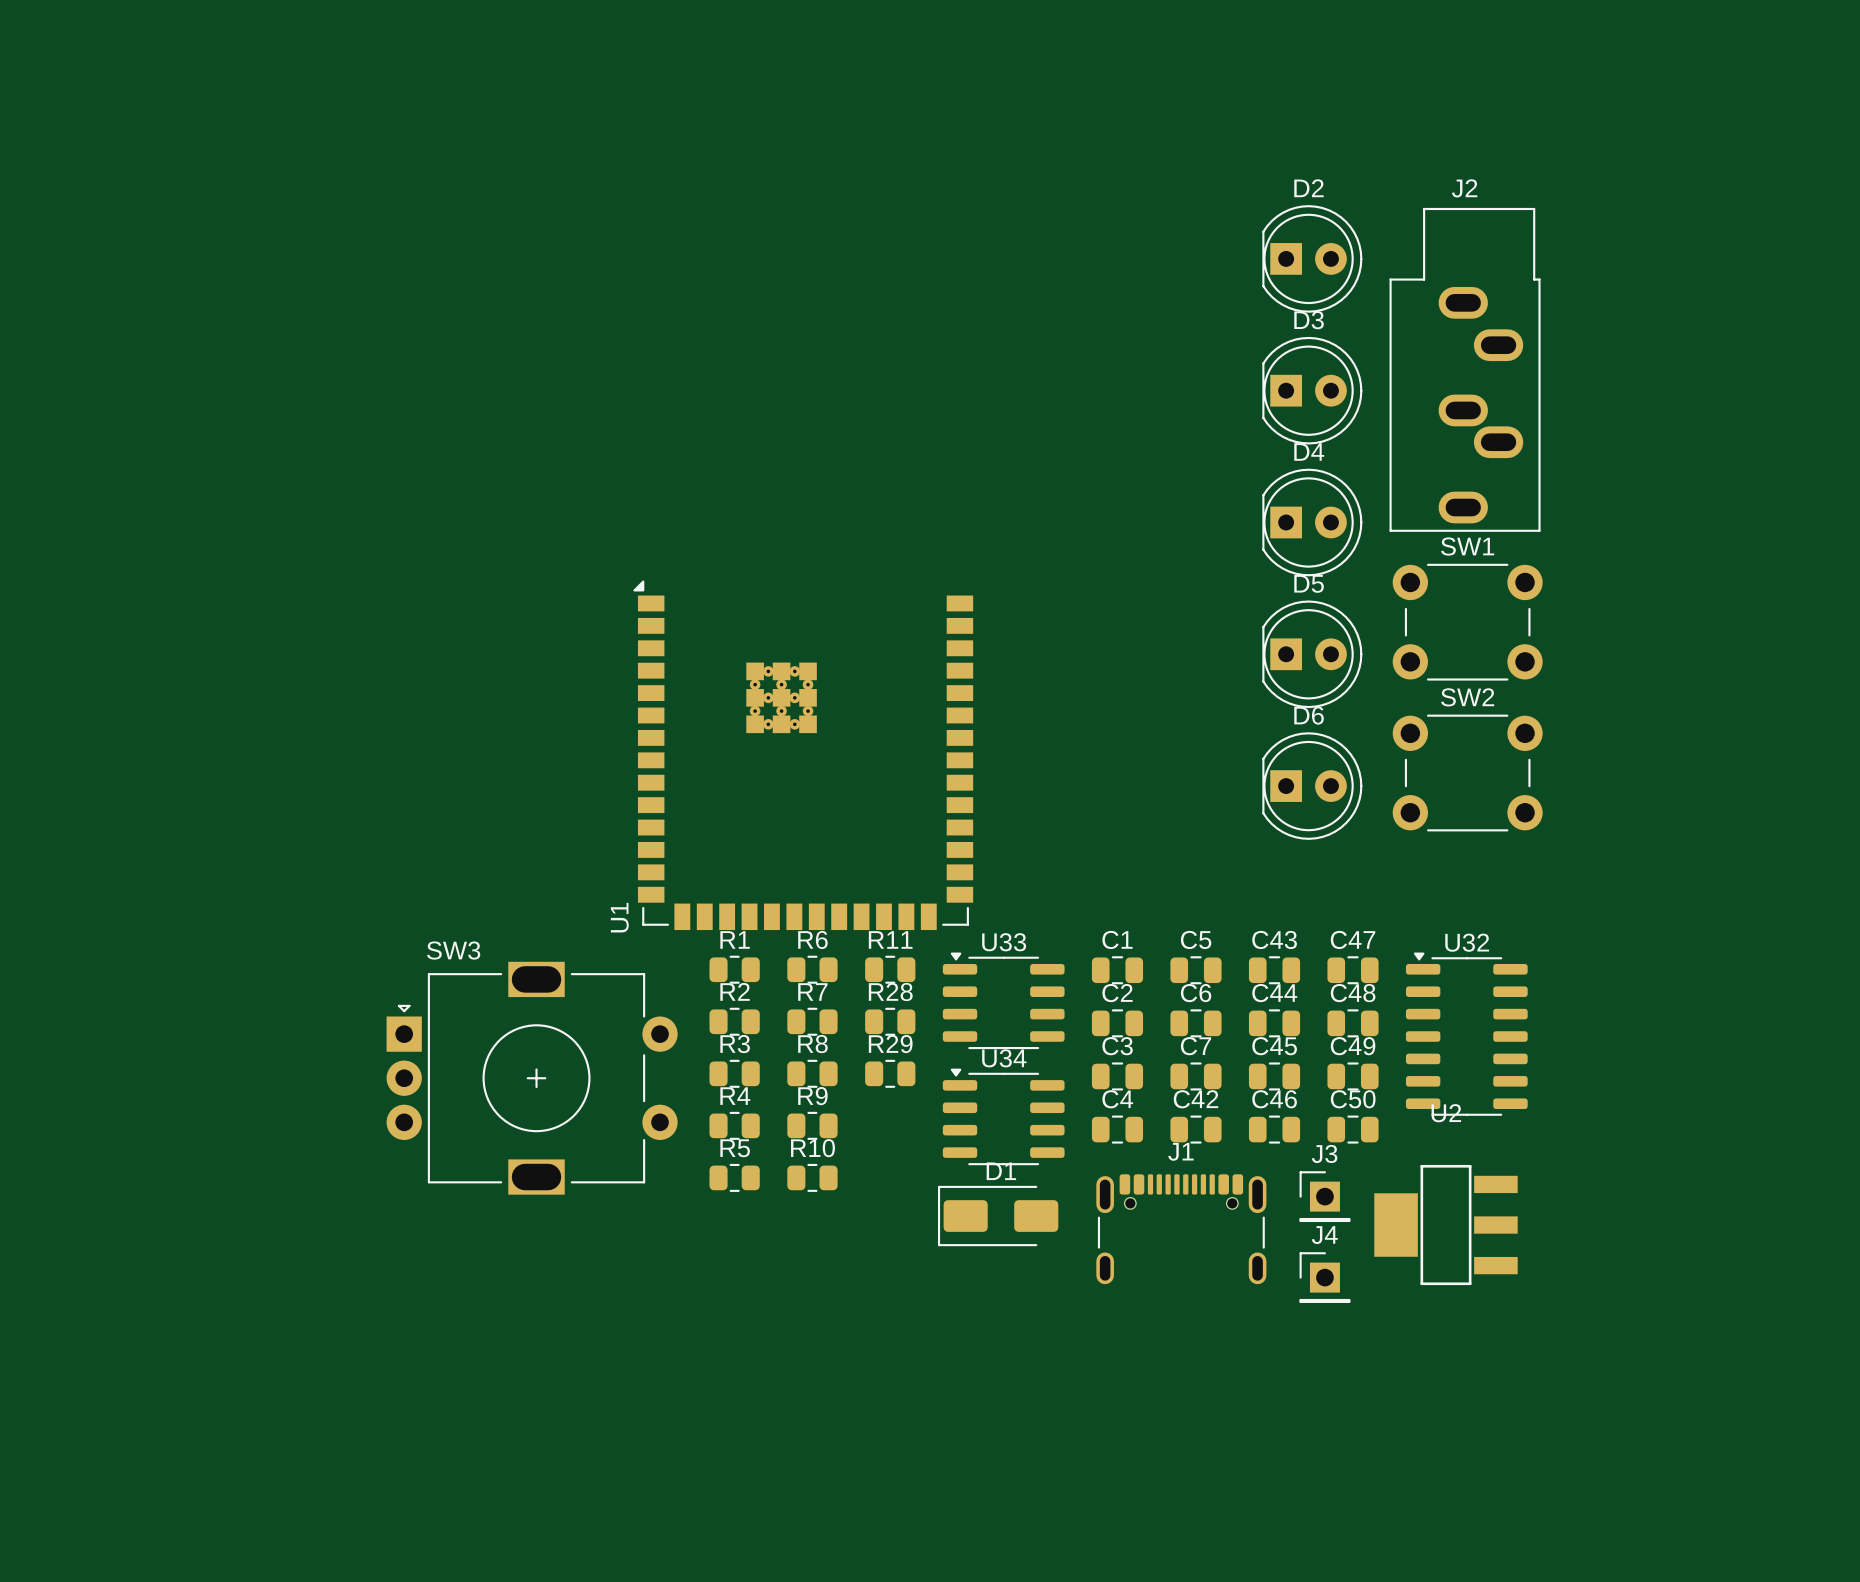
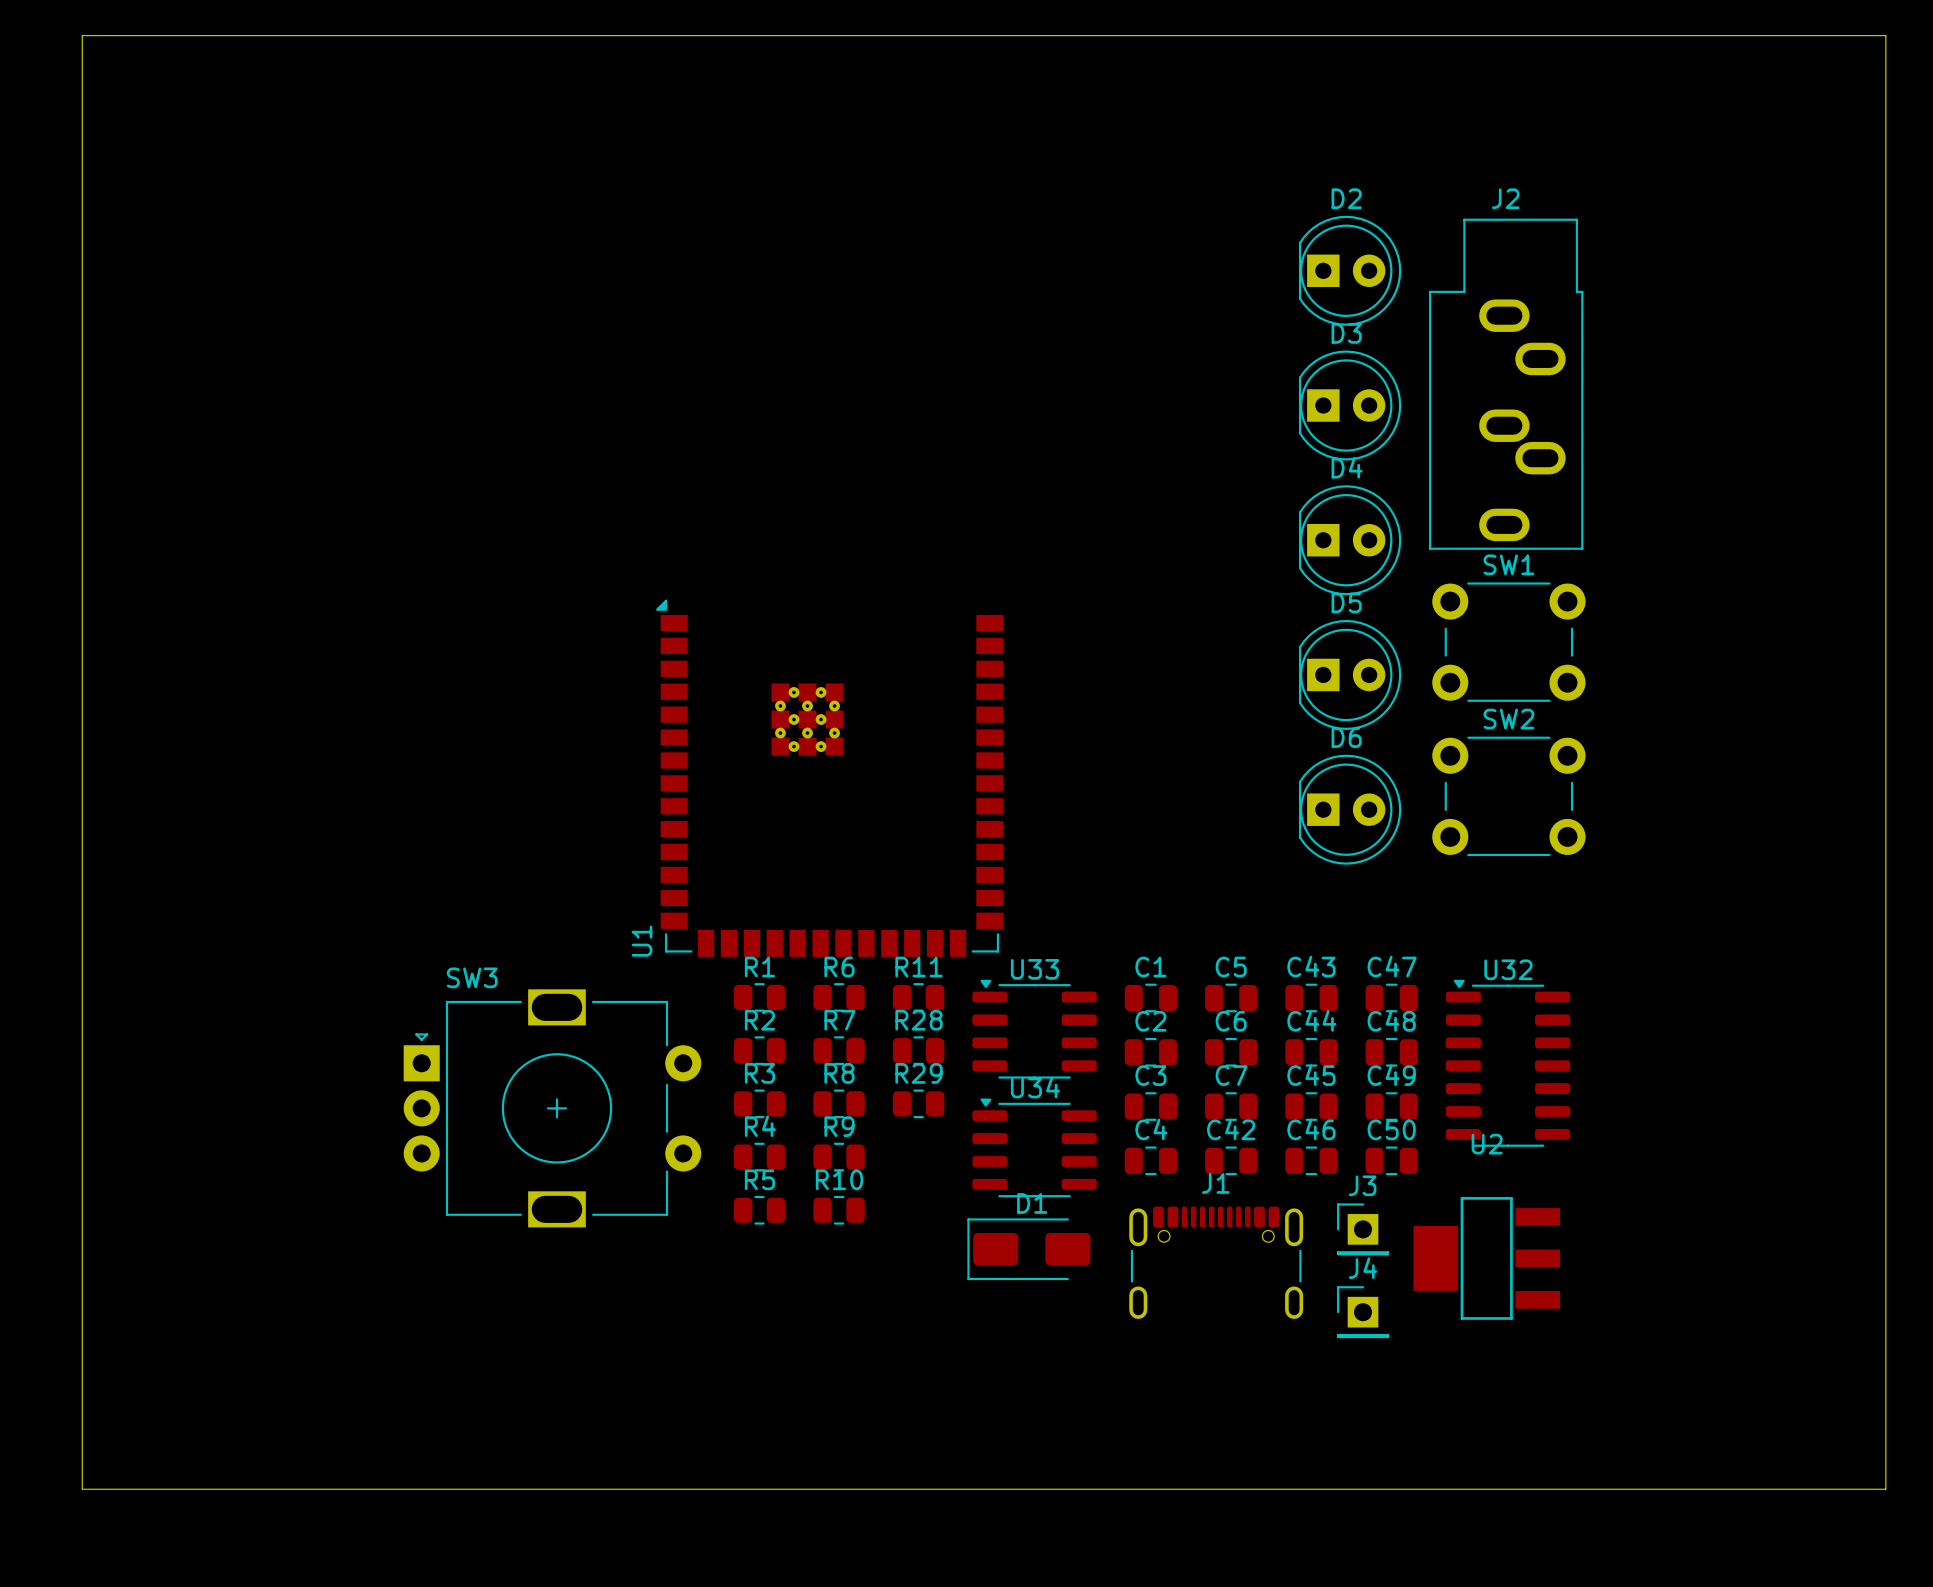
board edge: none -> (82, 35) (1885, 35) (1885, 1489) (82, 1489) (82, 35)

